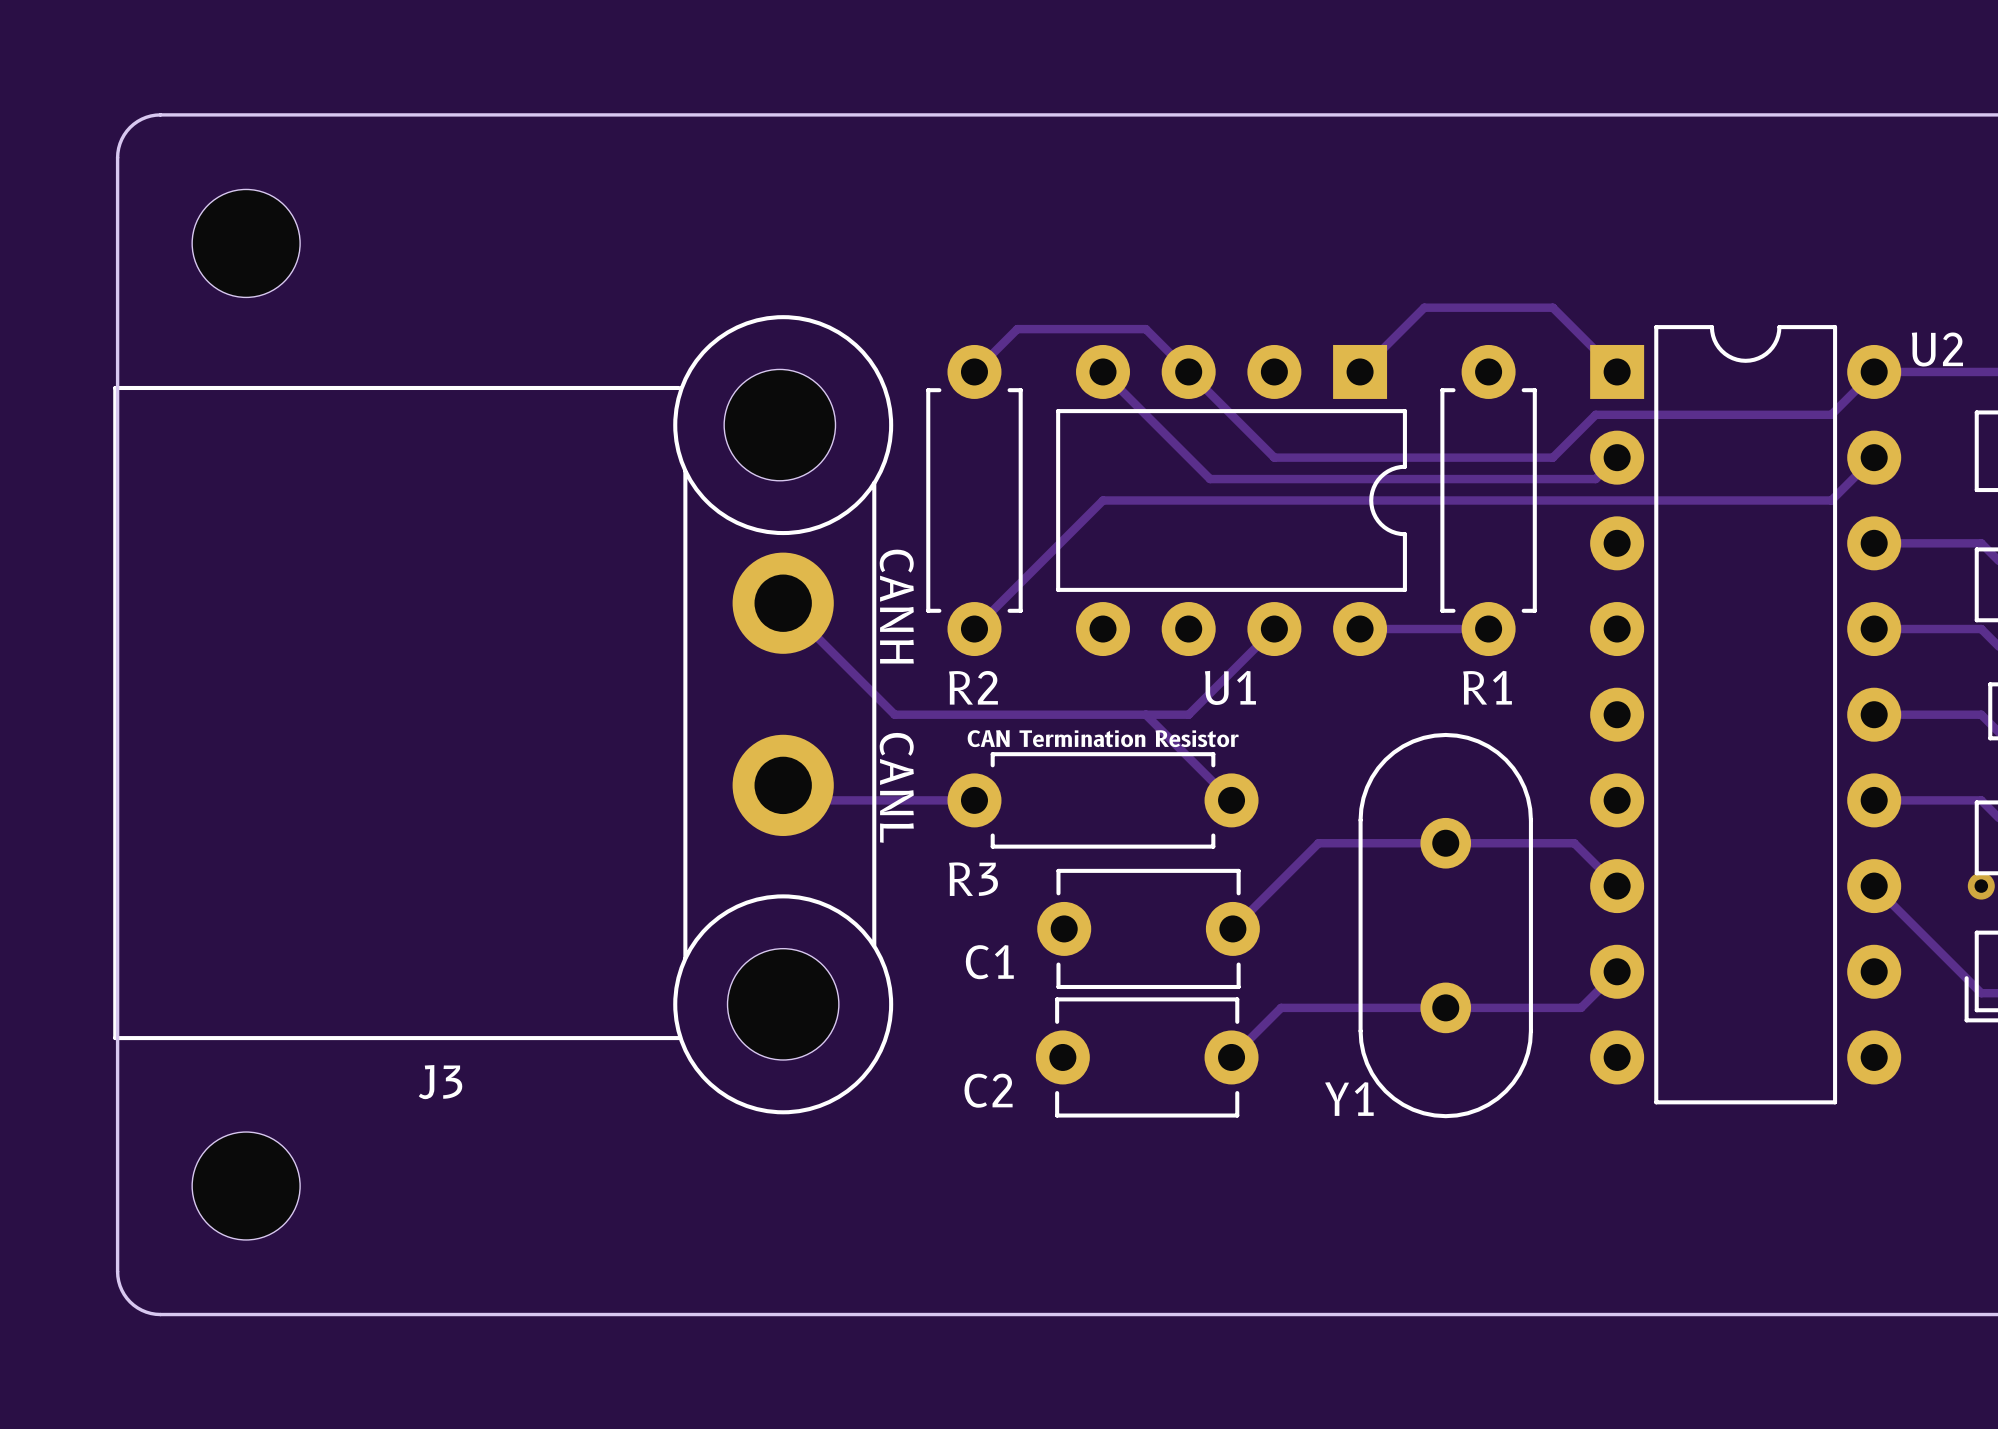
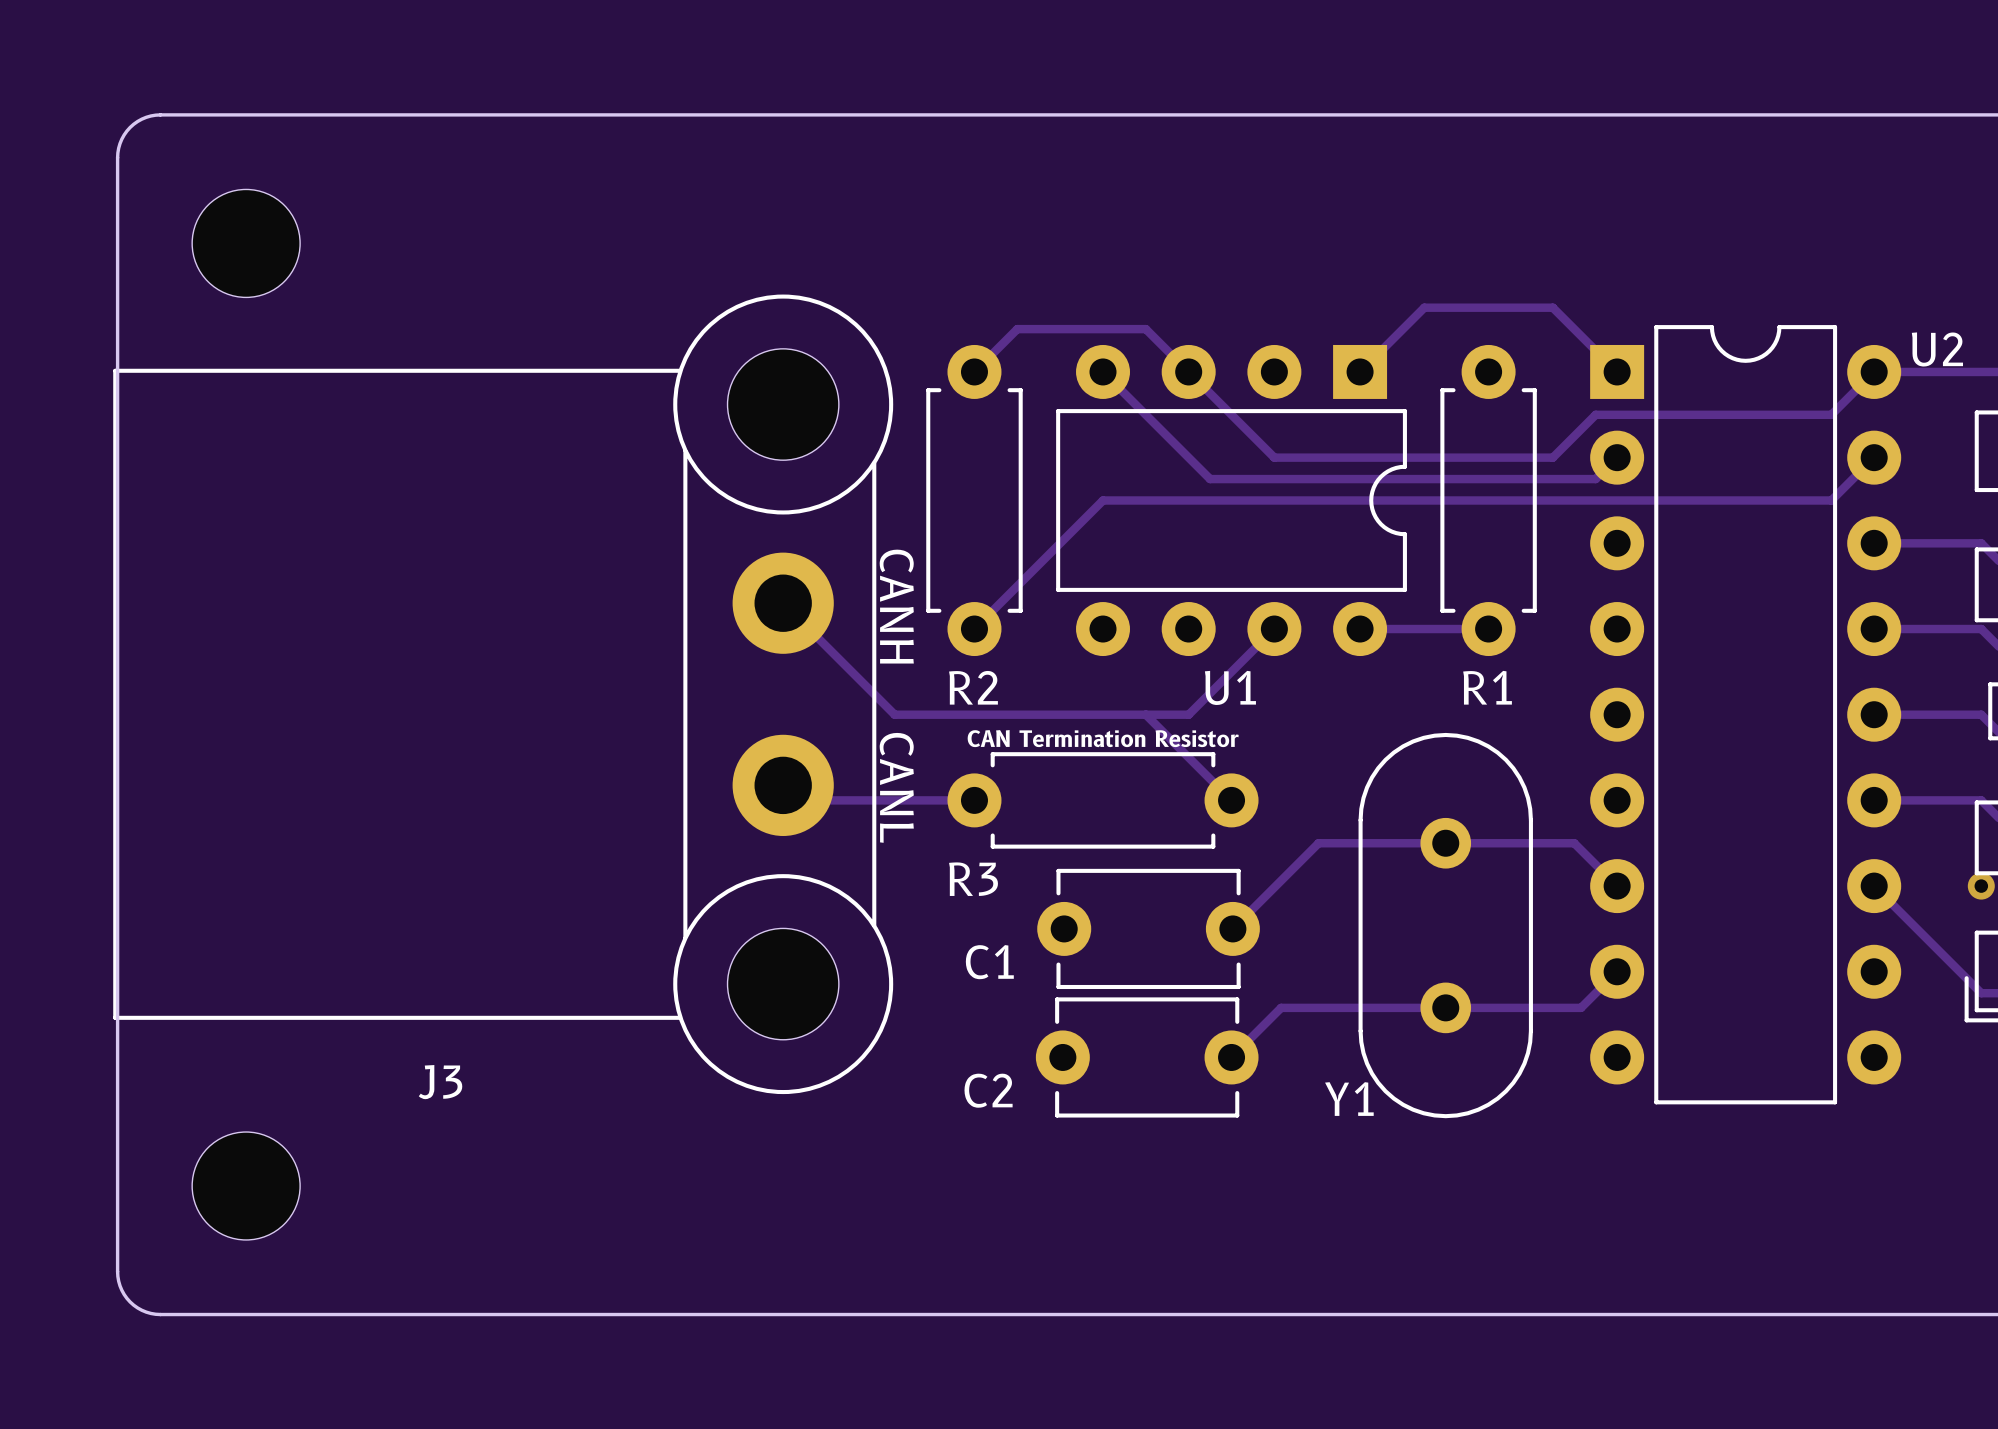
J3 footprint: [113, 315, 894, 1115] -> [113, 294, 894, 1095]

